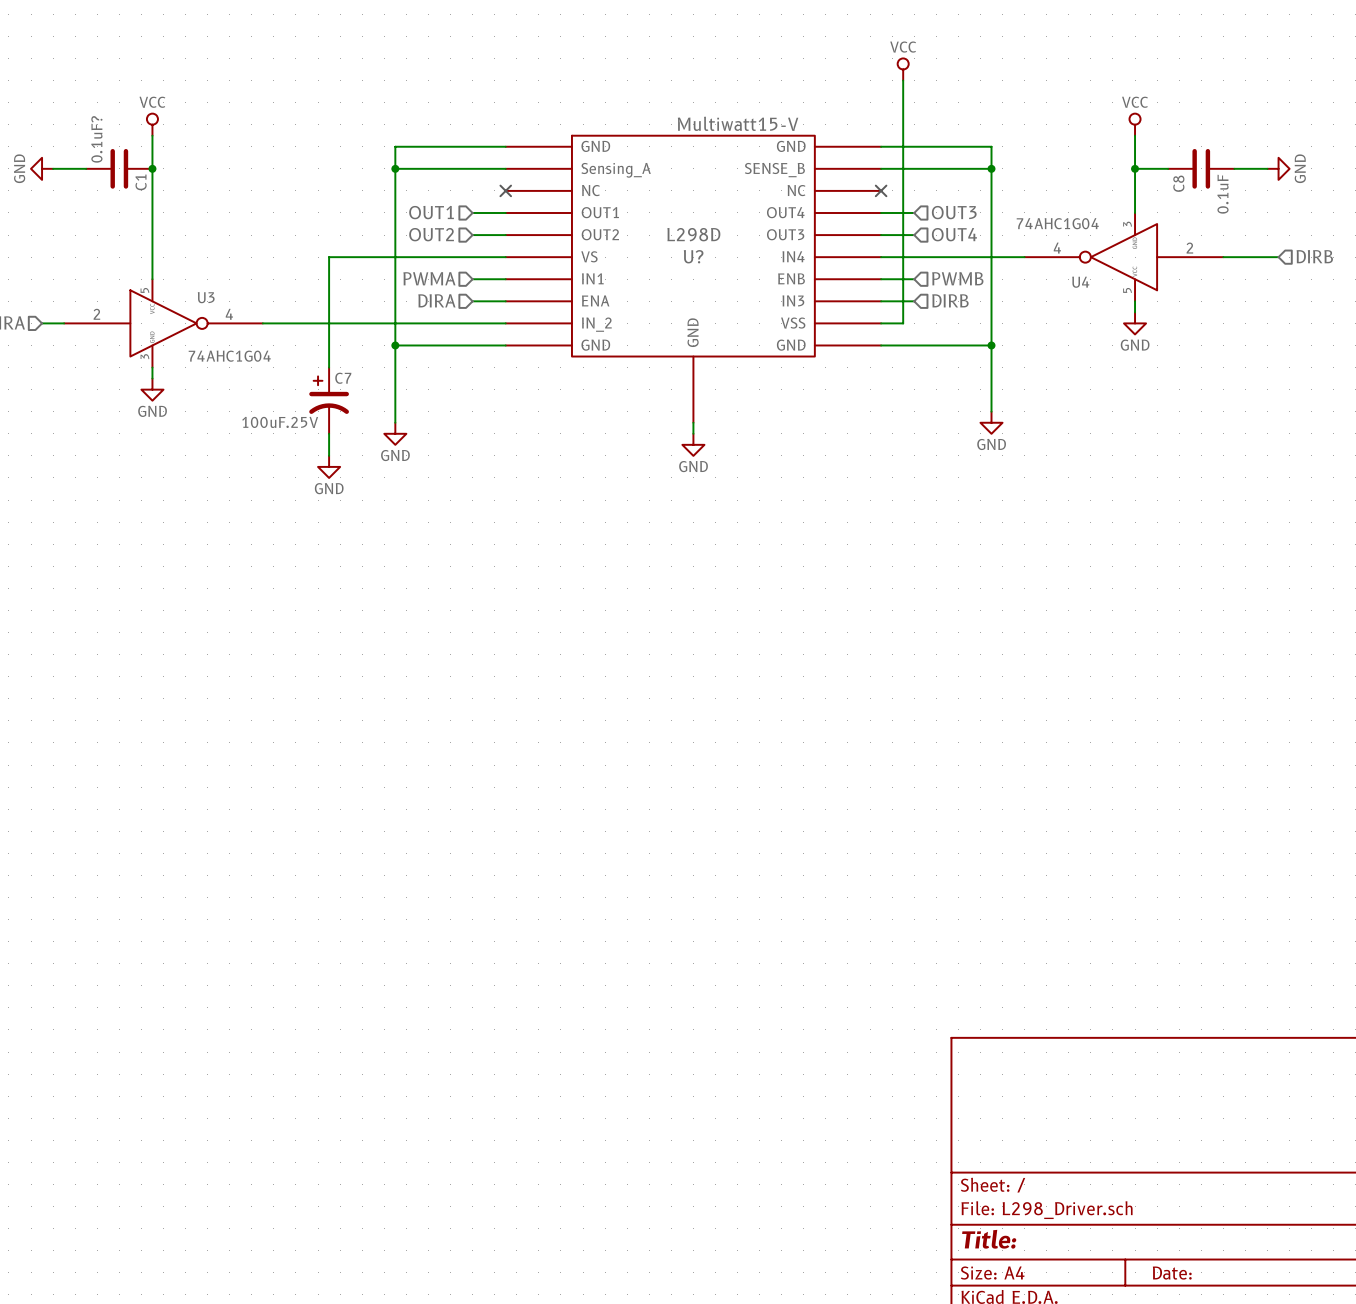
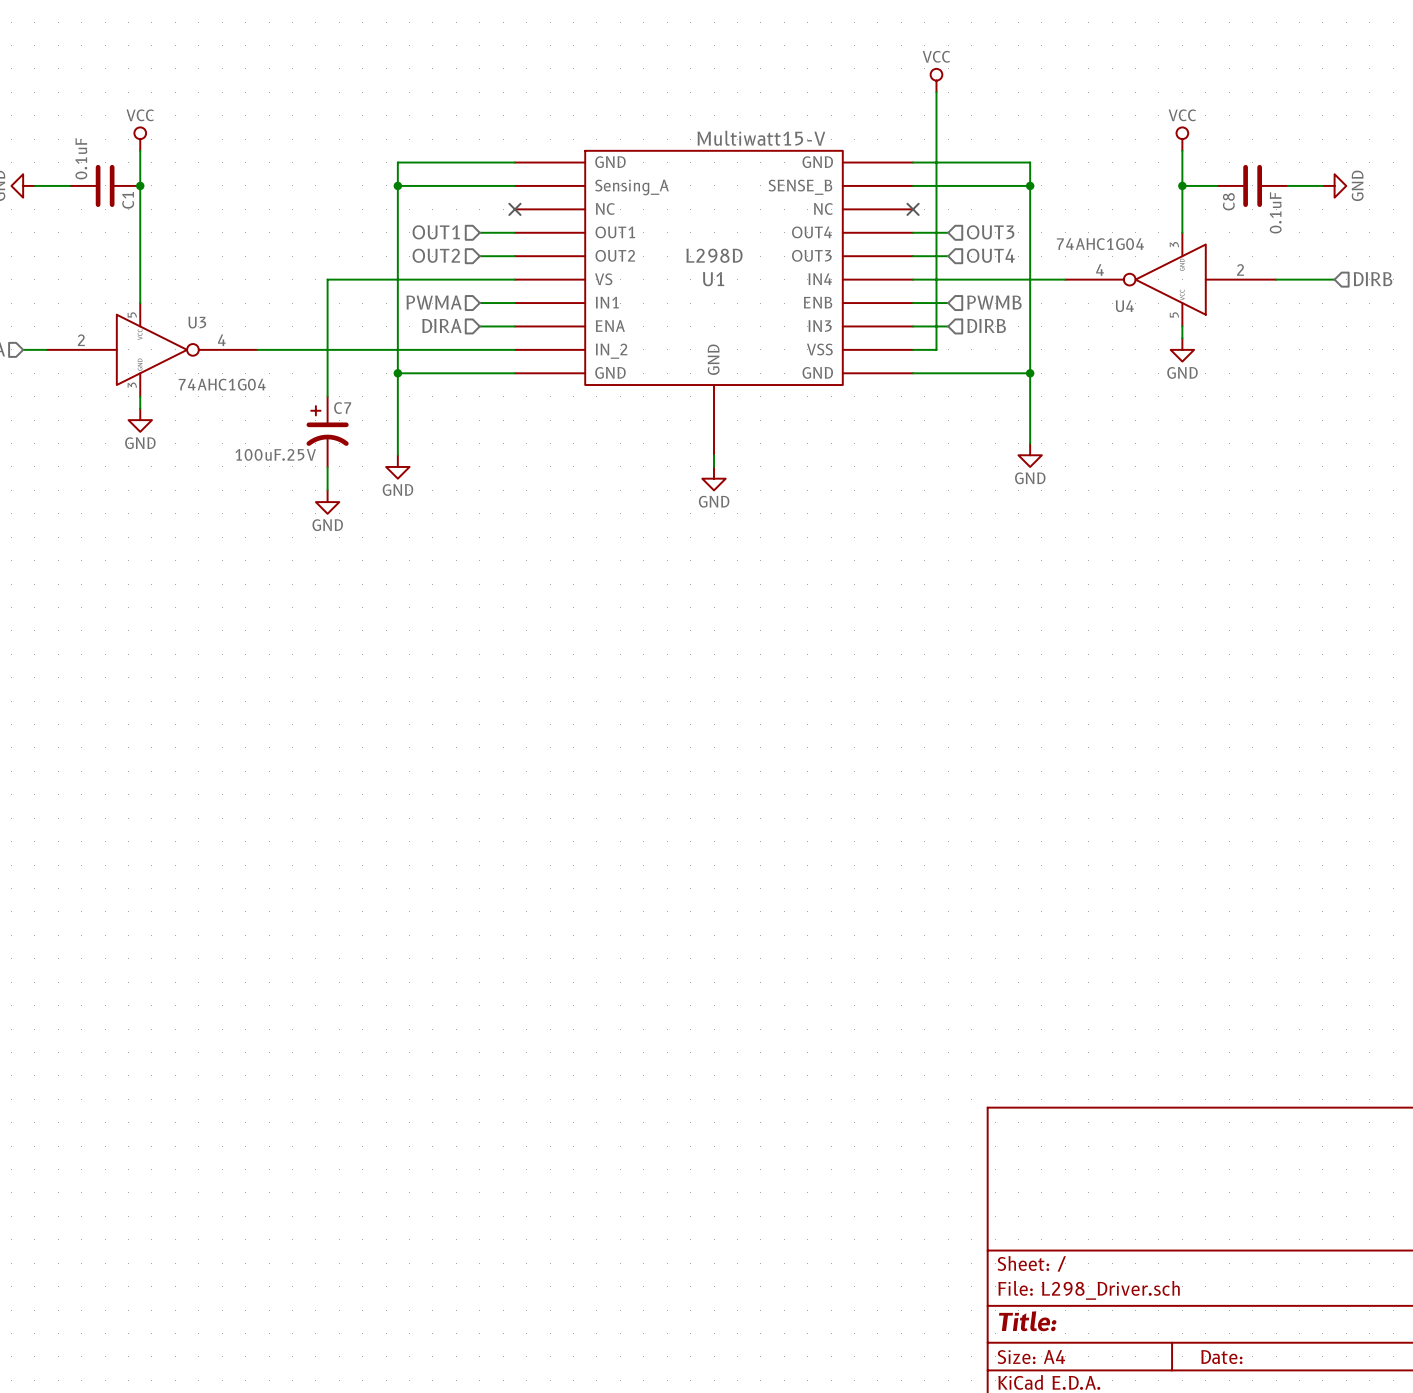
0.1uF? name: 0.1uF? (96, 139) -> 0.1uF (81, 158)
U? name: U? (693, 256) -> U1 (713, 279)

